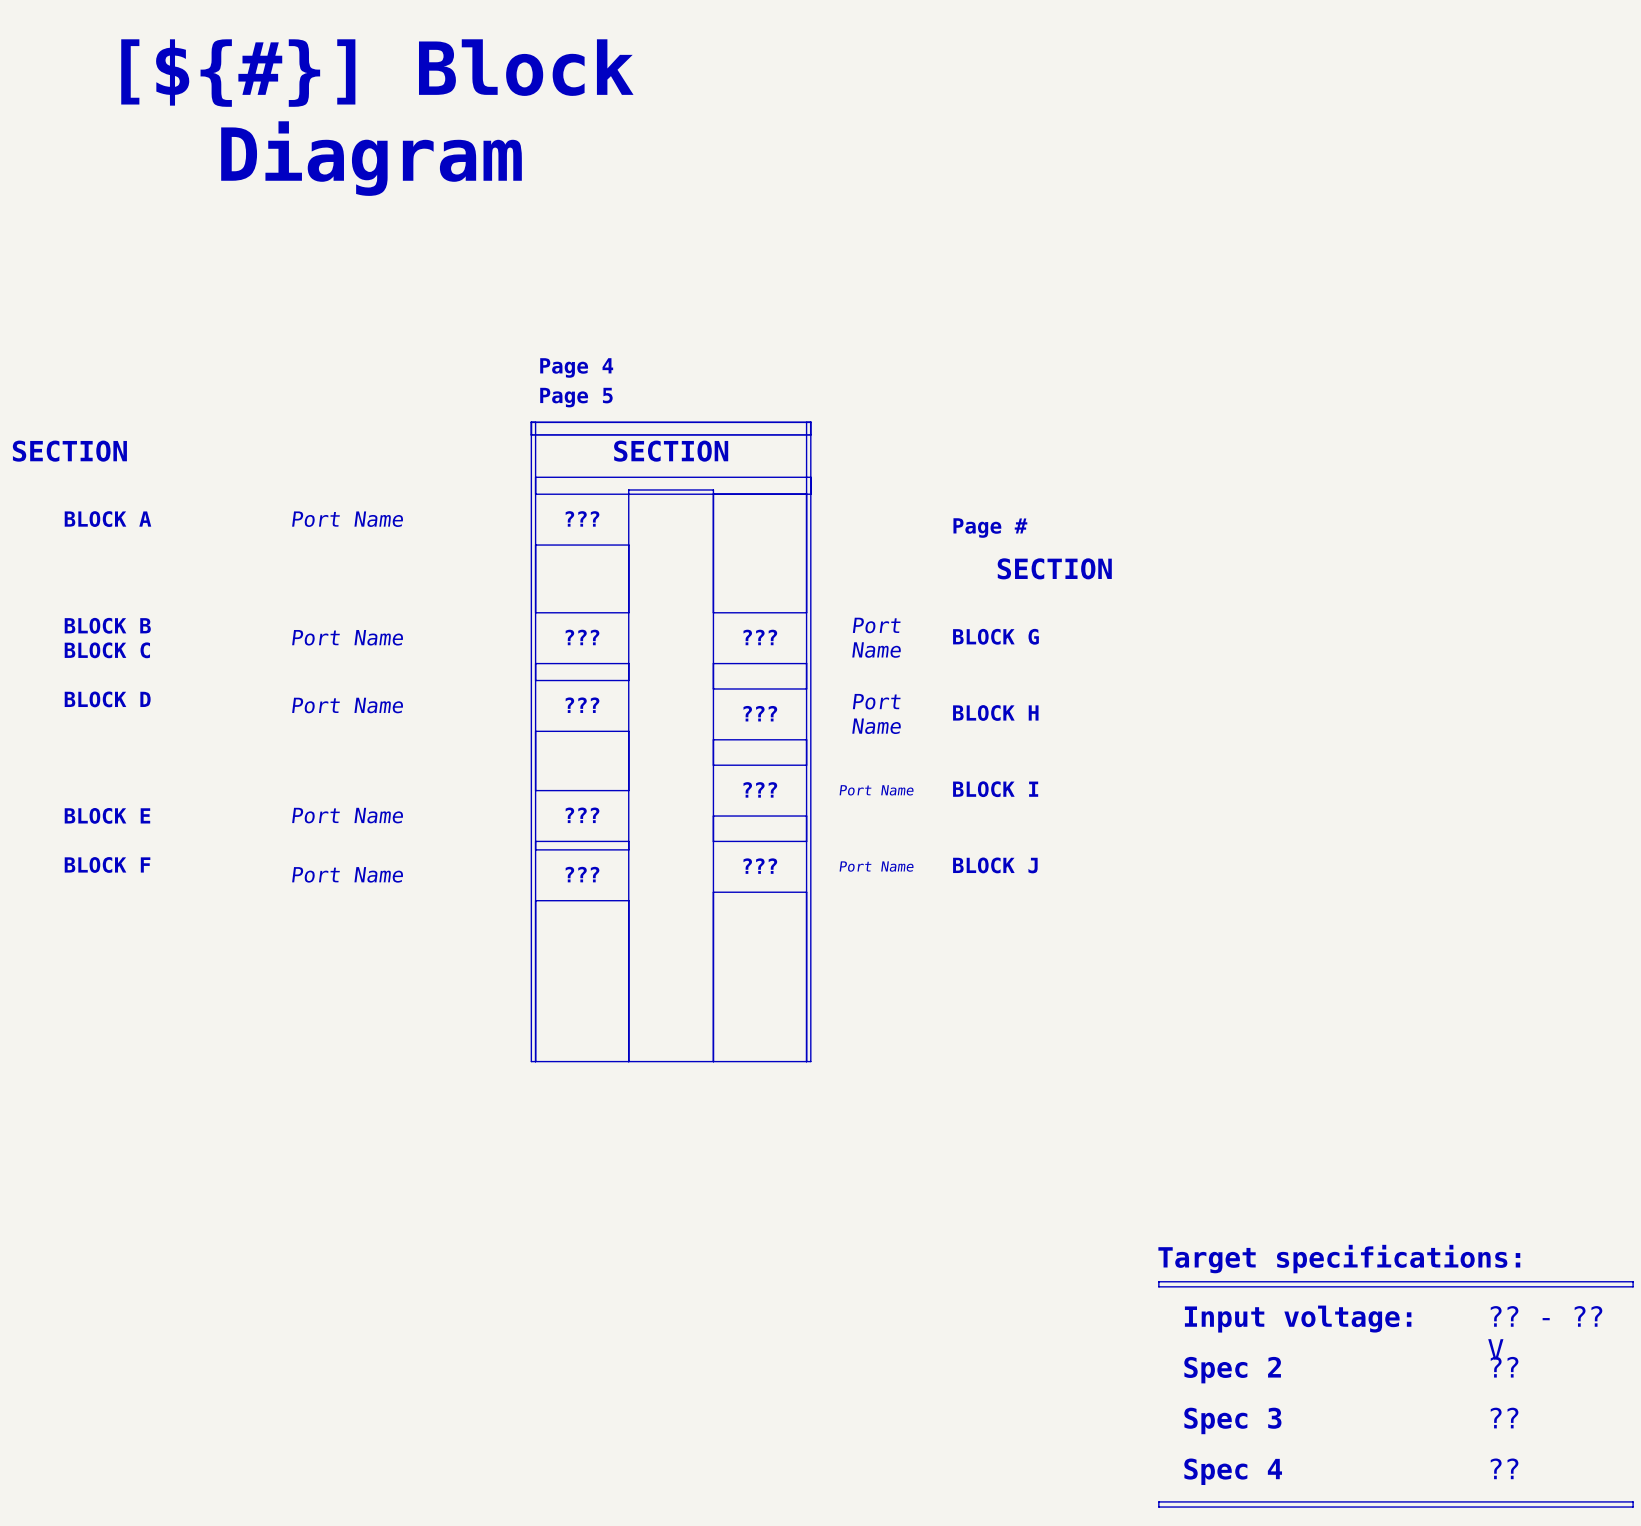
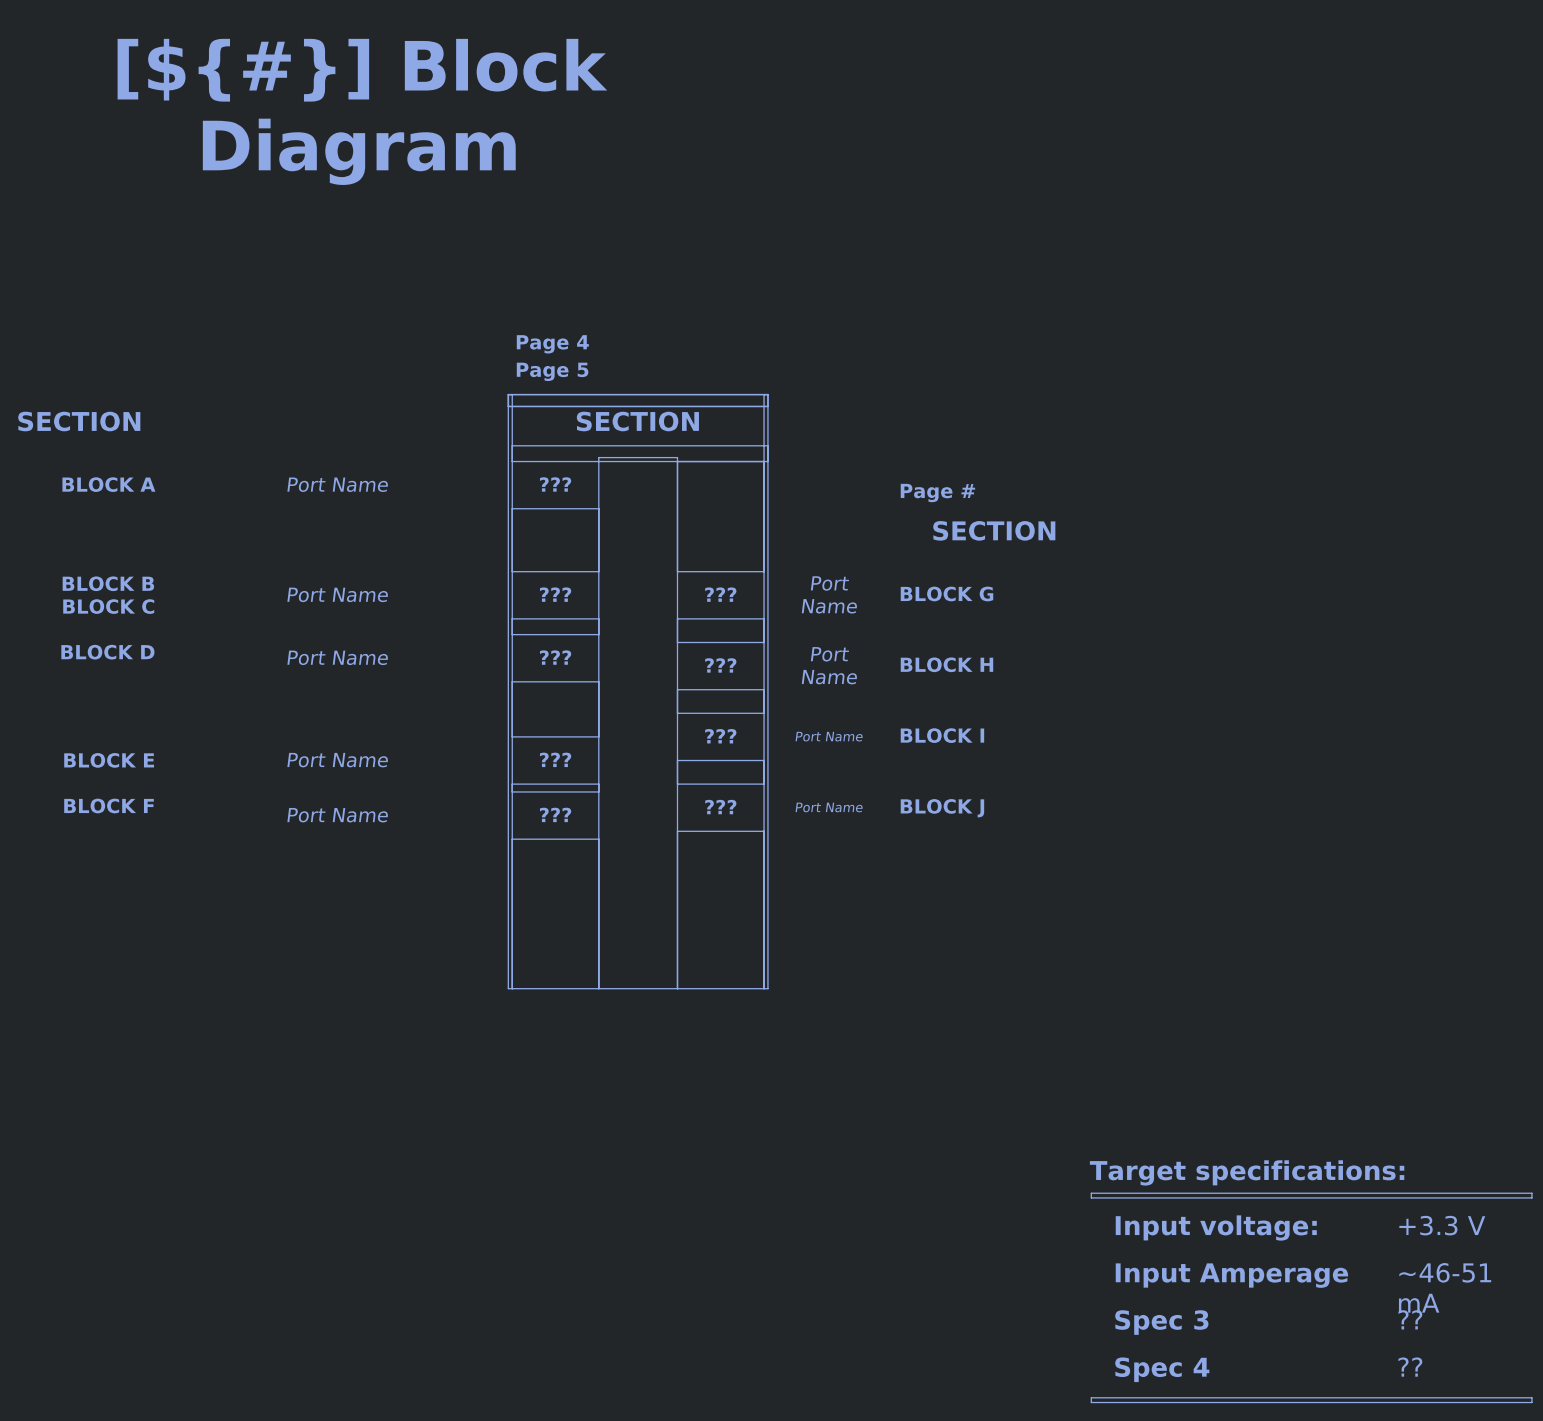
text: ?? - ?? (1546, 1316) -> +3.3 V (1442, 1225)
text: V (1495, 1349) -> none
text: ?? (1504, 1367) -> ~46-51 (1445, 1272)
text: Spec 2 (1232, 1370) -> Input Amperage (1231, 1275)
text: none -> mA (1419, 1303)

